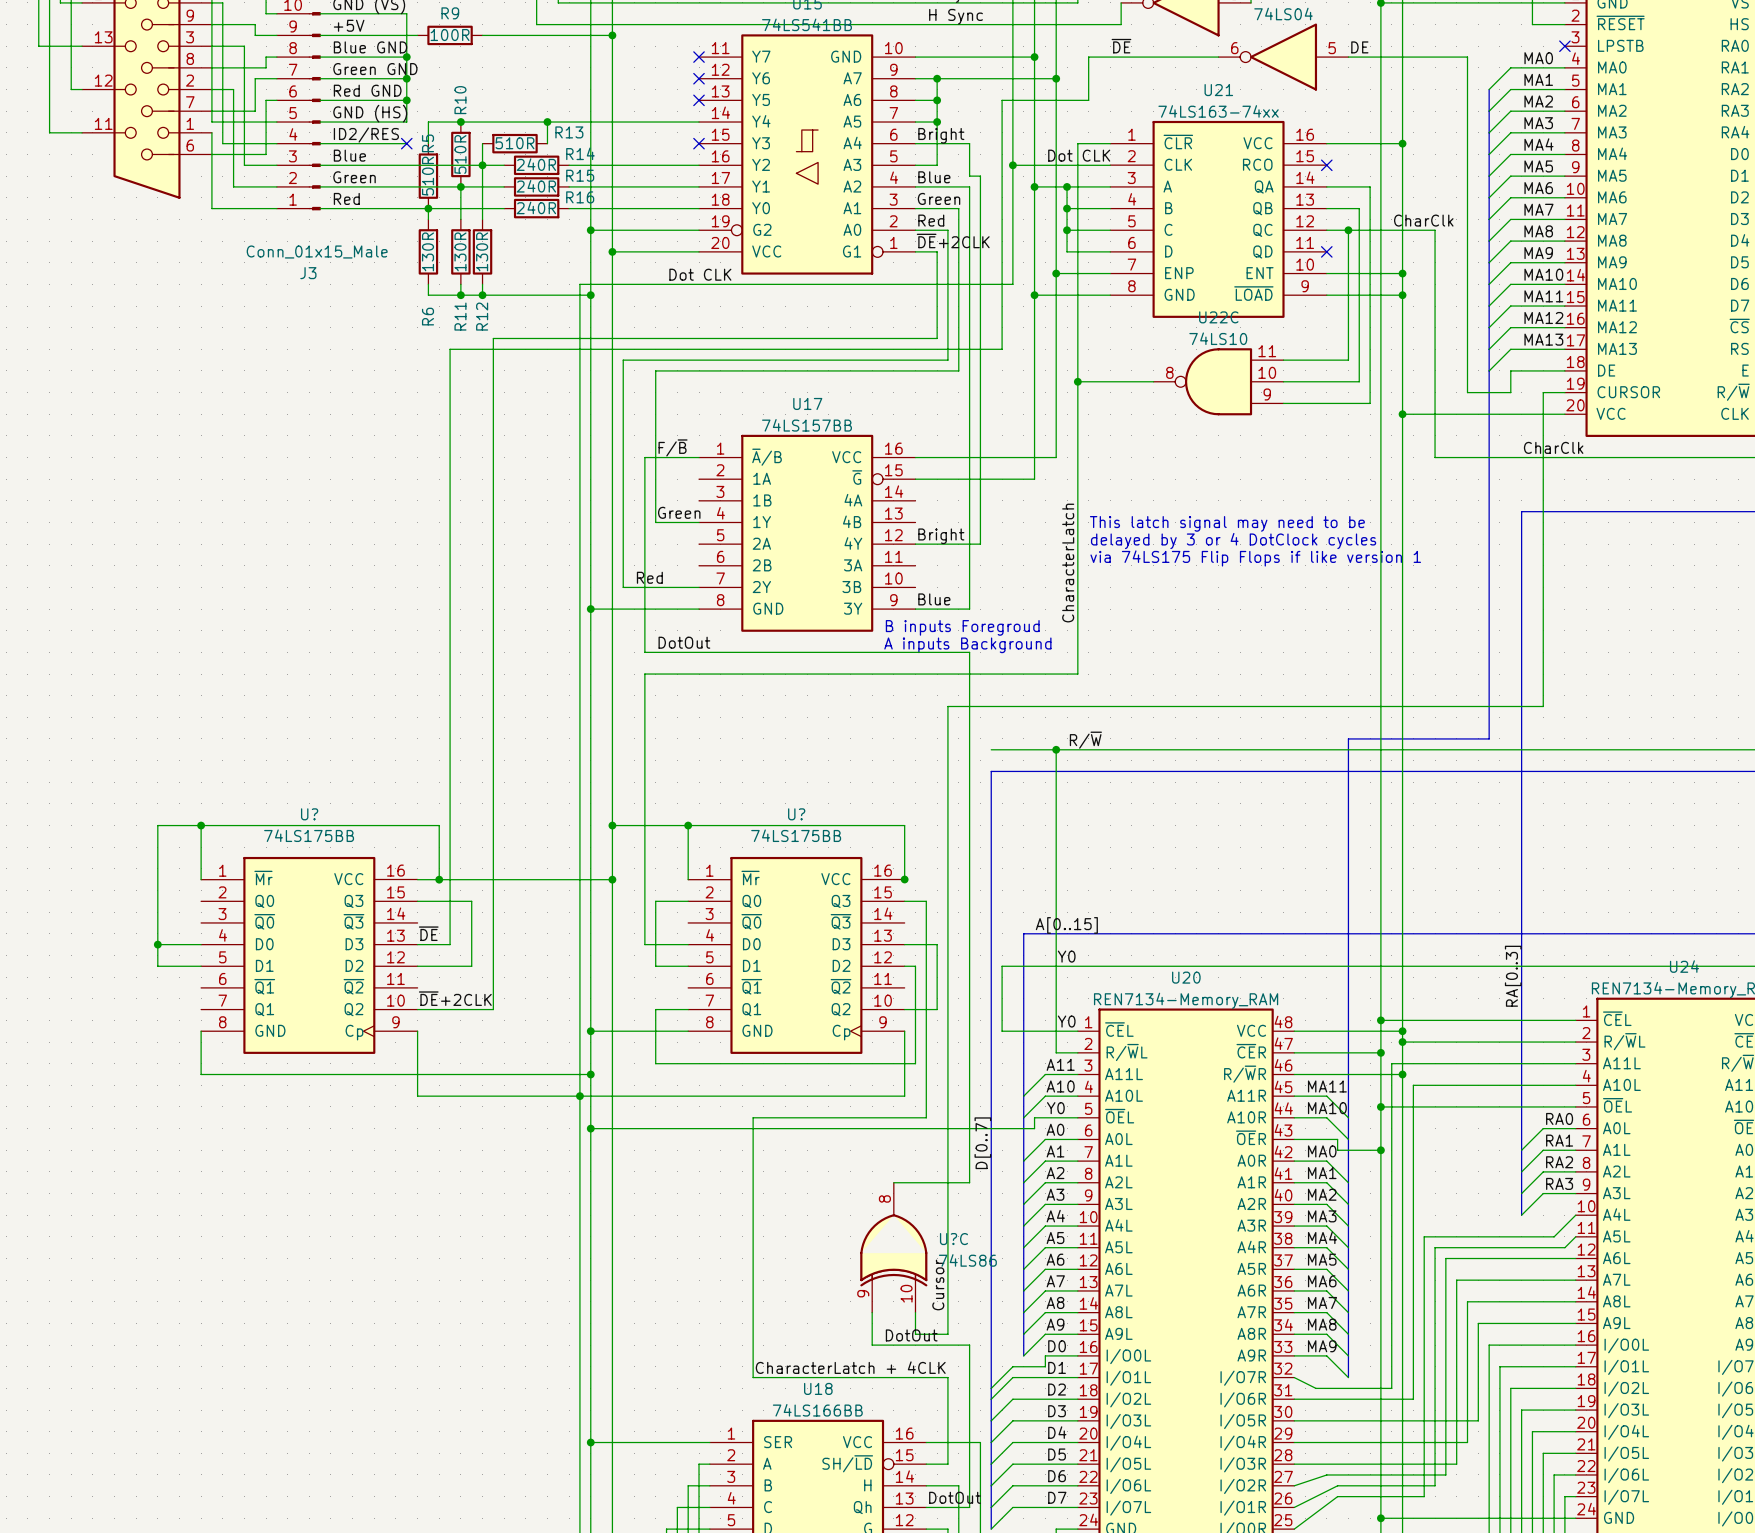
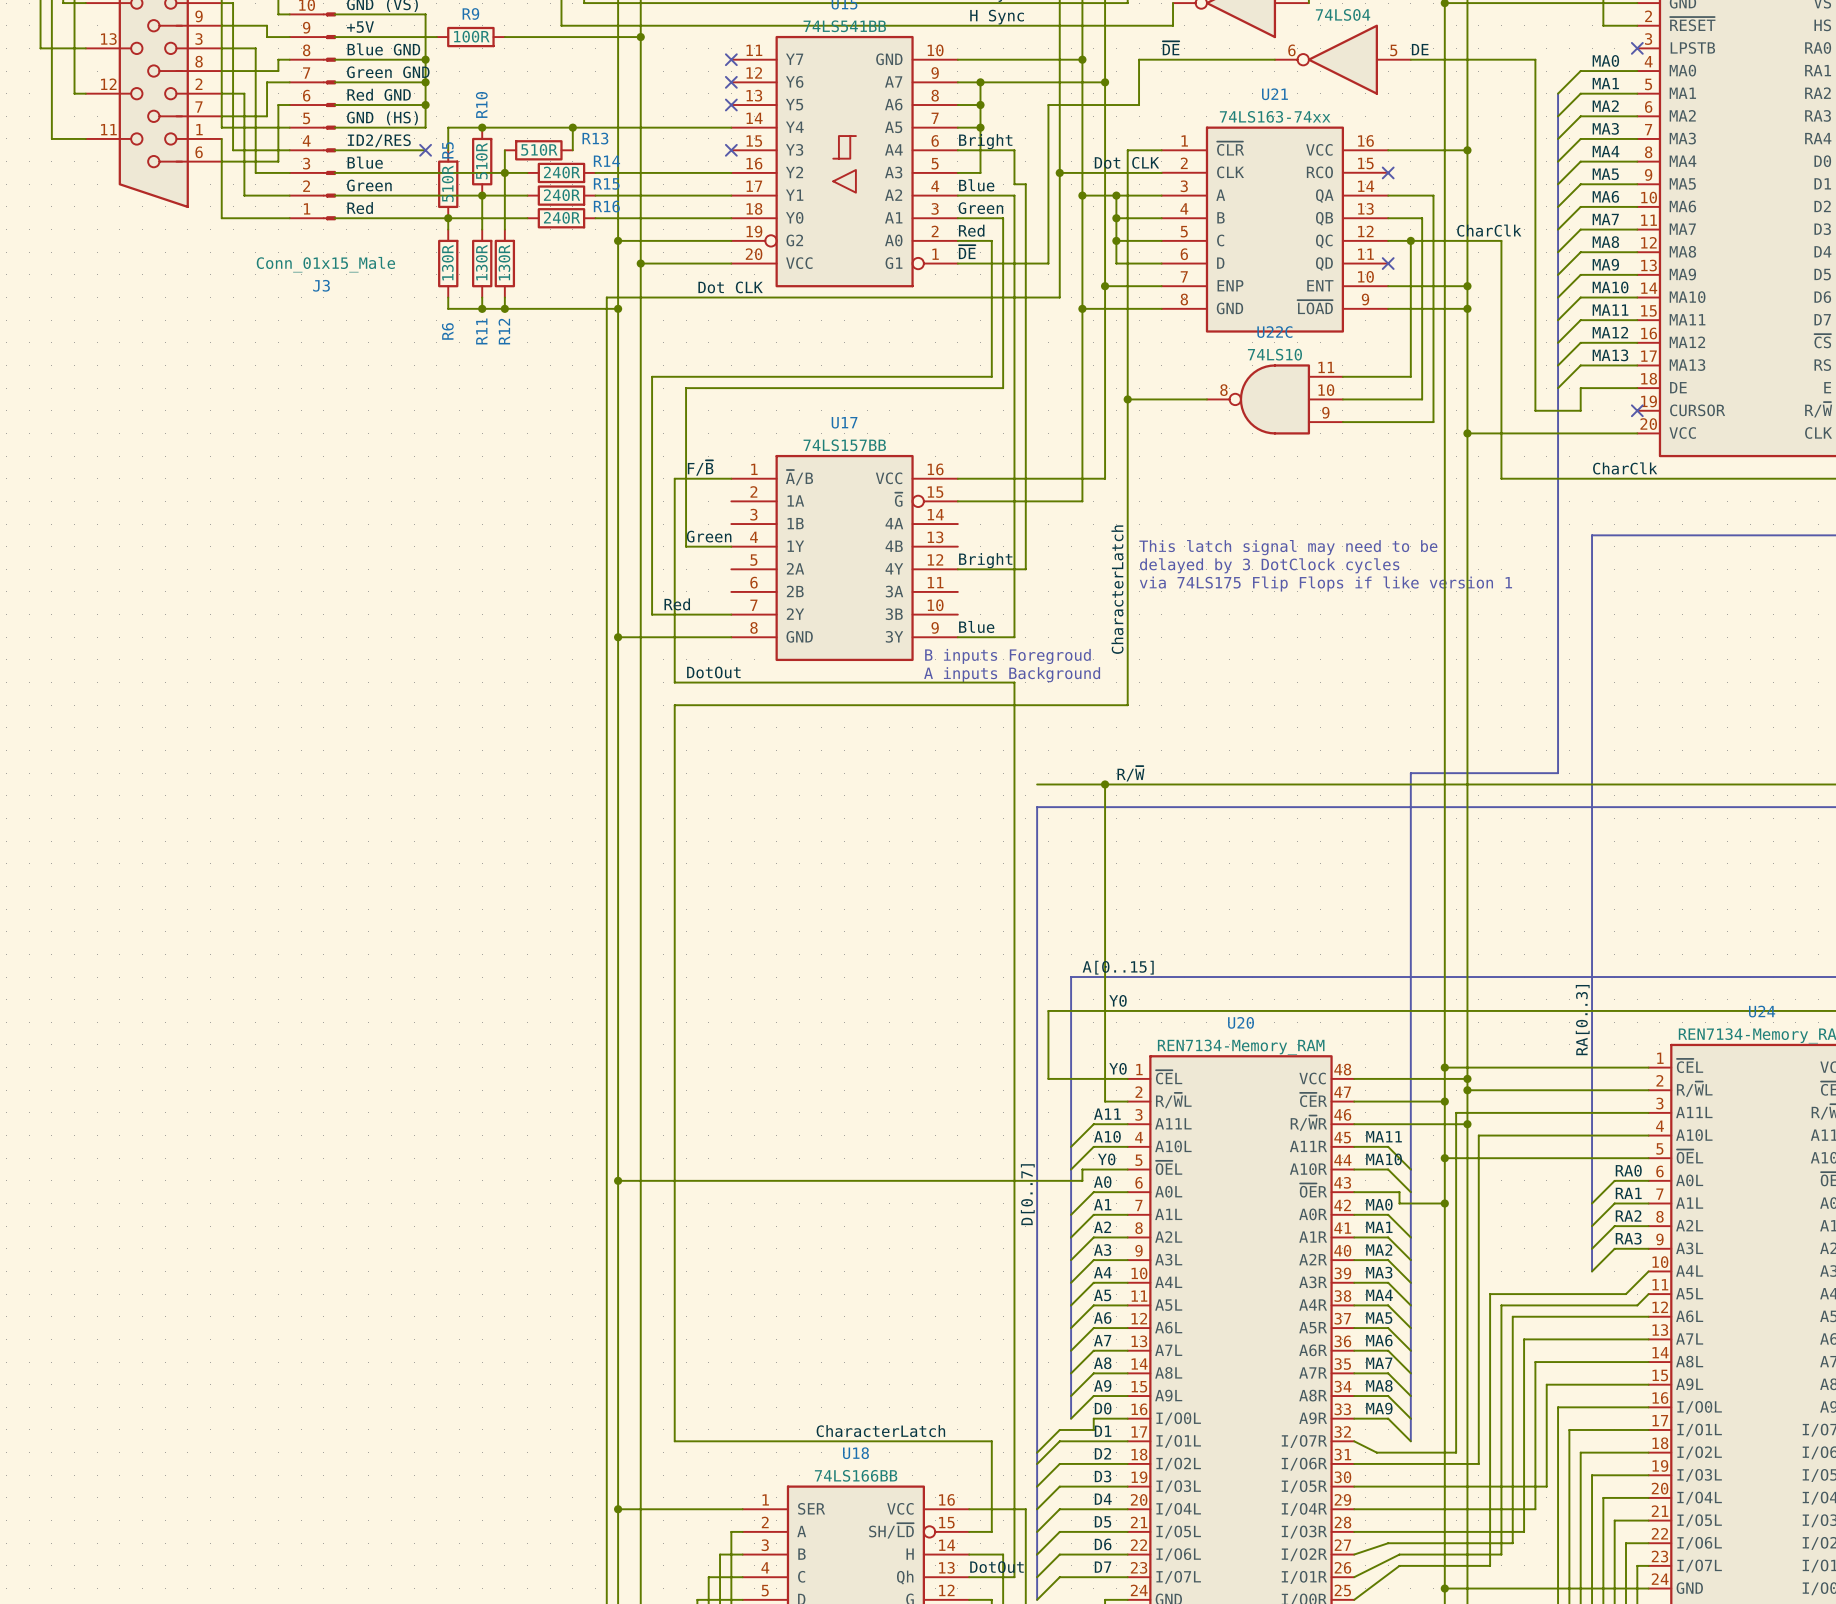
label: ~{DE}+2CLK (953, 240) -> ~{DE} (967, 252)
wire: (937, 251) (937, 338) (493, 338) (493, 1009) (417, 1009) -> none
wire: (1002, 251) (1002, 349) (450, 349) (450, 944) (417, 944) -> (1048, 263) (980, 263)
wire: (1564, 392) (1543, 392) (1543, 706) (947, 706) (947, 1334) (915, 1334) (915, 1312) -> none
no-connect mark: none -> (1637, 410)
text: delayed by 3 or 4 DotClock cycles (1233, 541) -> delayed by 3 DotClock cycles (1269, 565)
wire: (201, 825) (201, 879) -> none
junction: (201, 825) -> none
wire: (612, 825) (904, 825) (904, 879) -> none
junction: (612, 825) -> none
wire: (688, 825) (688, 879) -> none
junction: (688, 825) -> none
wire: (417, 879) (612, 879) -> none
wire: (439, 879) (439, 825) (157, 825) (157, 966) (201, 966) -> none
junction: (439, 879) -> none
junction: (612, 879) -> none
junction: (904, 879) -> none
wire: (417, 901) (471, 901) (471, 966) (417, 966) -> none
wire: (688, 901) (655, 901) (655, 966) (688, 966) -> none
wire: (904, 901) (926, 901) (926, 1117) (753, 1117) (753, 1377) -> (674, 988) (674, 1441) (787, 1441)
label: ~{DE} (428, 933) -> none
wire: (157, 944) (201, 944) -> none
junction: (157, 944) -> none
wire: (644, 944) (688, 944) -> none
wire: (904, 944) (937, 944) (937, 1009) (904, 1009) -> none
U?: 74LS175BB (309, 955) -> none
U?: 74LS175BB (796, 955) -> none
wire: (904, 966) (915, 966) (915, 1063) (655, 1063) (655, 1009) (688, 1009) -> none
label: ~{DE}+2CLK (455, 998) -> none
wire: (201, 1031) (201, 1074) (590, 1074) -> none
wire: (417, 1031) (417, 1096) (904, 1096) (904, 1031) -> none
wire: (590, 1031) (688, 1031) -> none
junction: (590, 1031) -> none
junction: (590, 1074) -> none
junction: (579, 1096) -> none
wire: (893, 1182) (969, 1182) -> none
U?C: 74LS86 (893, 1247) -> none
label: Cursor (938, 1284) -> none
wire: (872, 1312) (872, 1345) (969, 1345) -> (1014, 1237) (1014, 1407)
label: DotOut (911, 1335) -> none
label: CharacterLatch + 4CLK (850, 1367) -> CharacterLatch (880, 1431)

